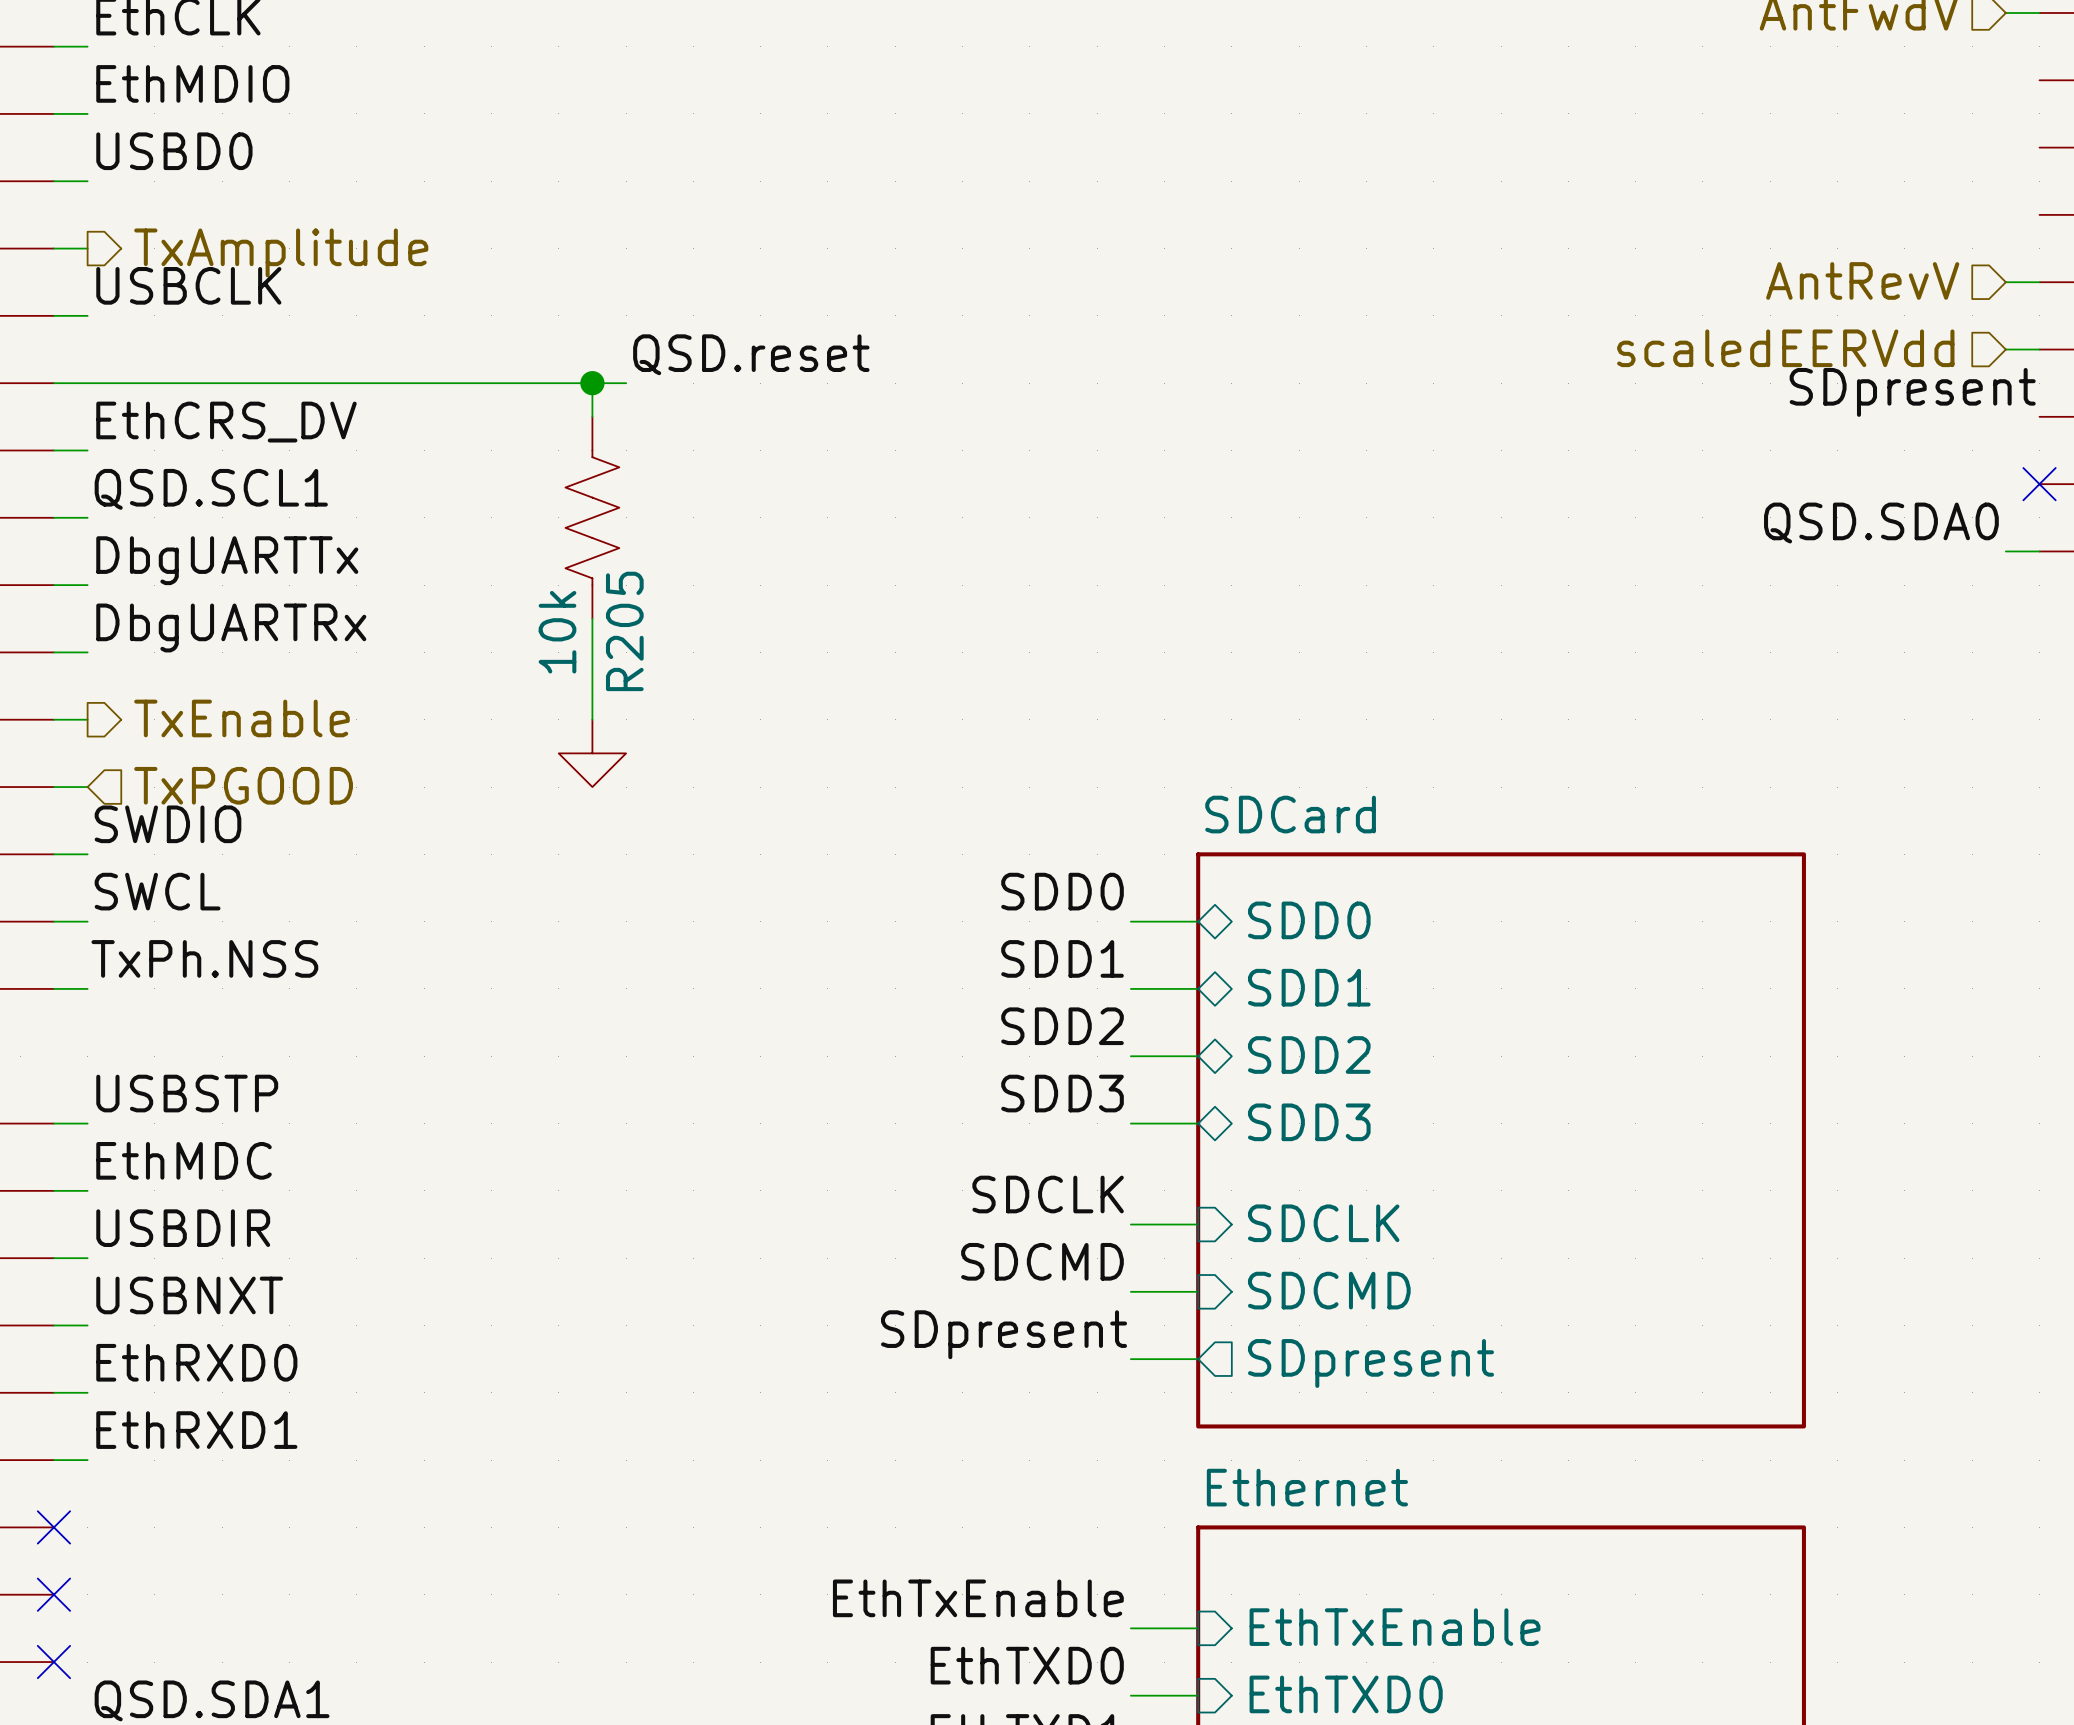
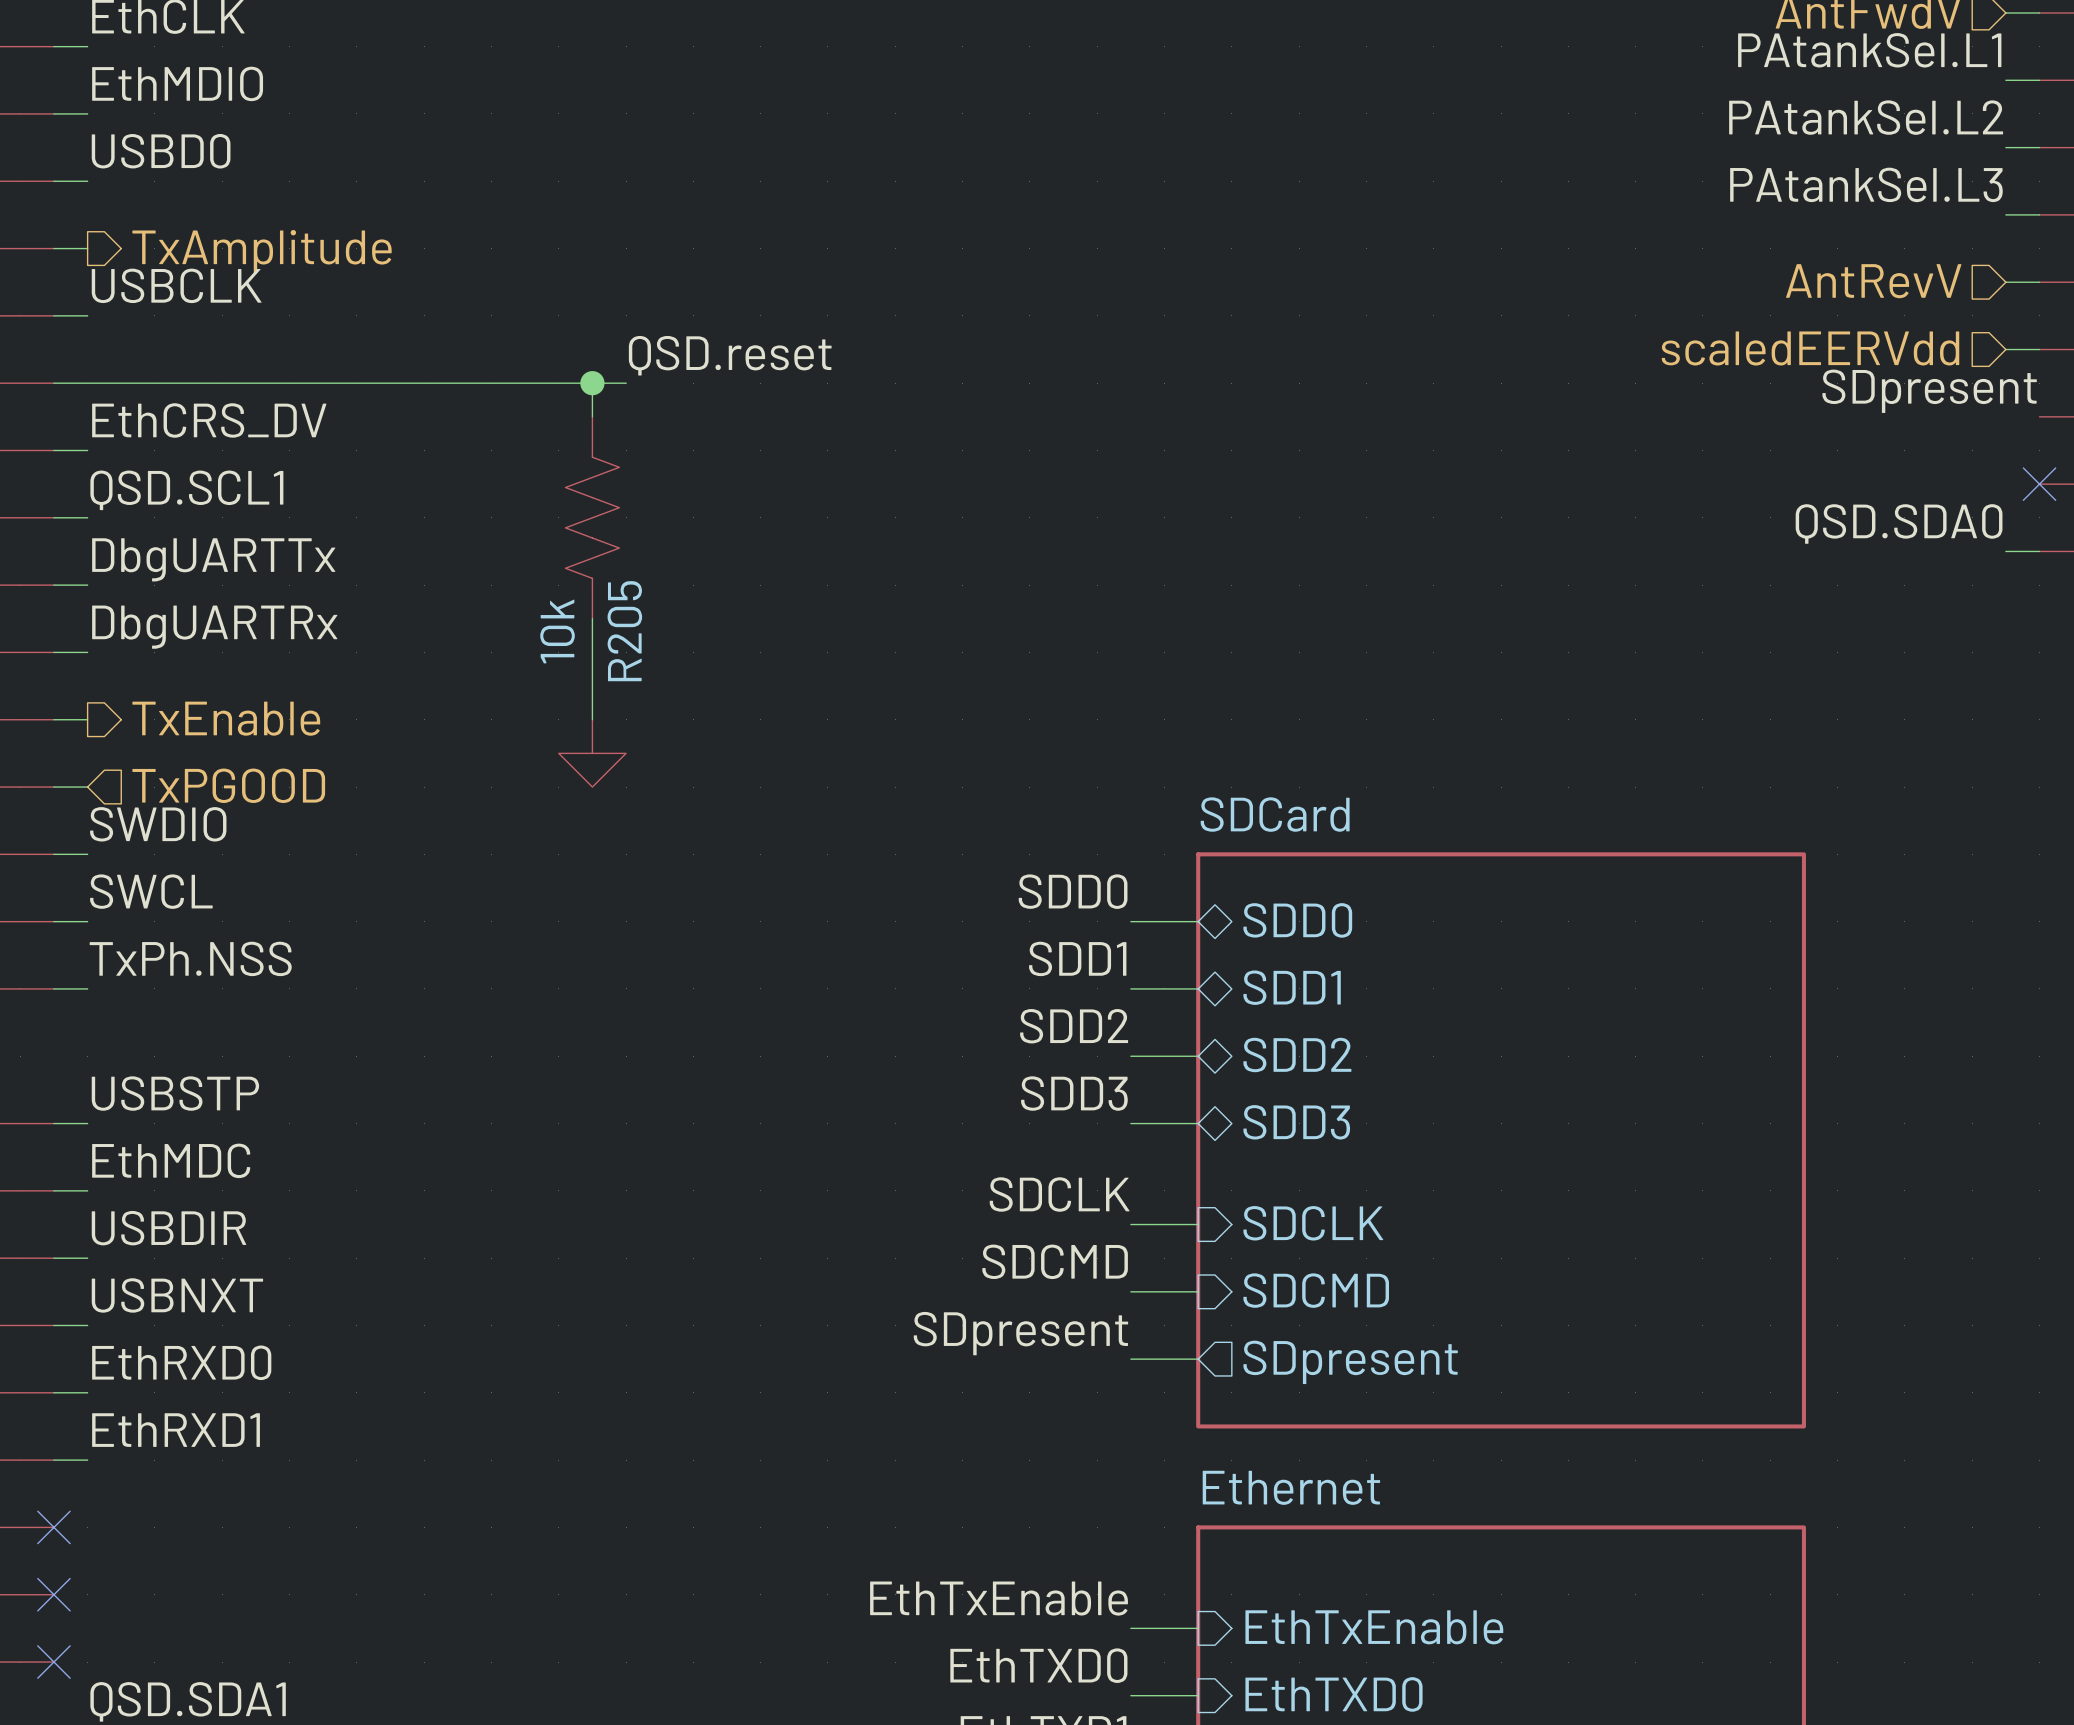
label: none -> PAtankSel.L1 (1869, 50)
wire: none -> (2005, 80) (2039, 80)
label: none -> PAtankSel.L2 (1866, 117)
wire: none -> (2005, 147) (2039, 147)
label: none -> PAtankSel.L3 (1866, 184)
wire: none -> (2005, 214) (2039, 214)

